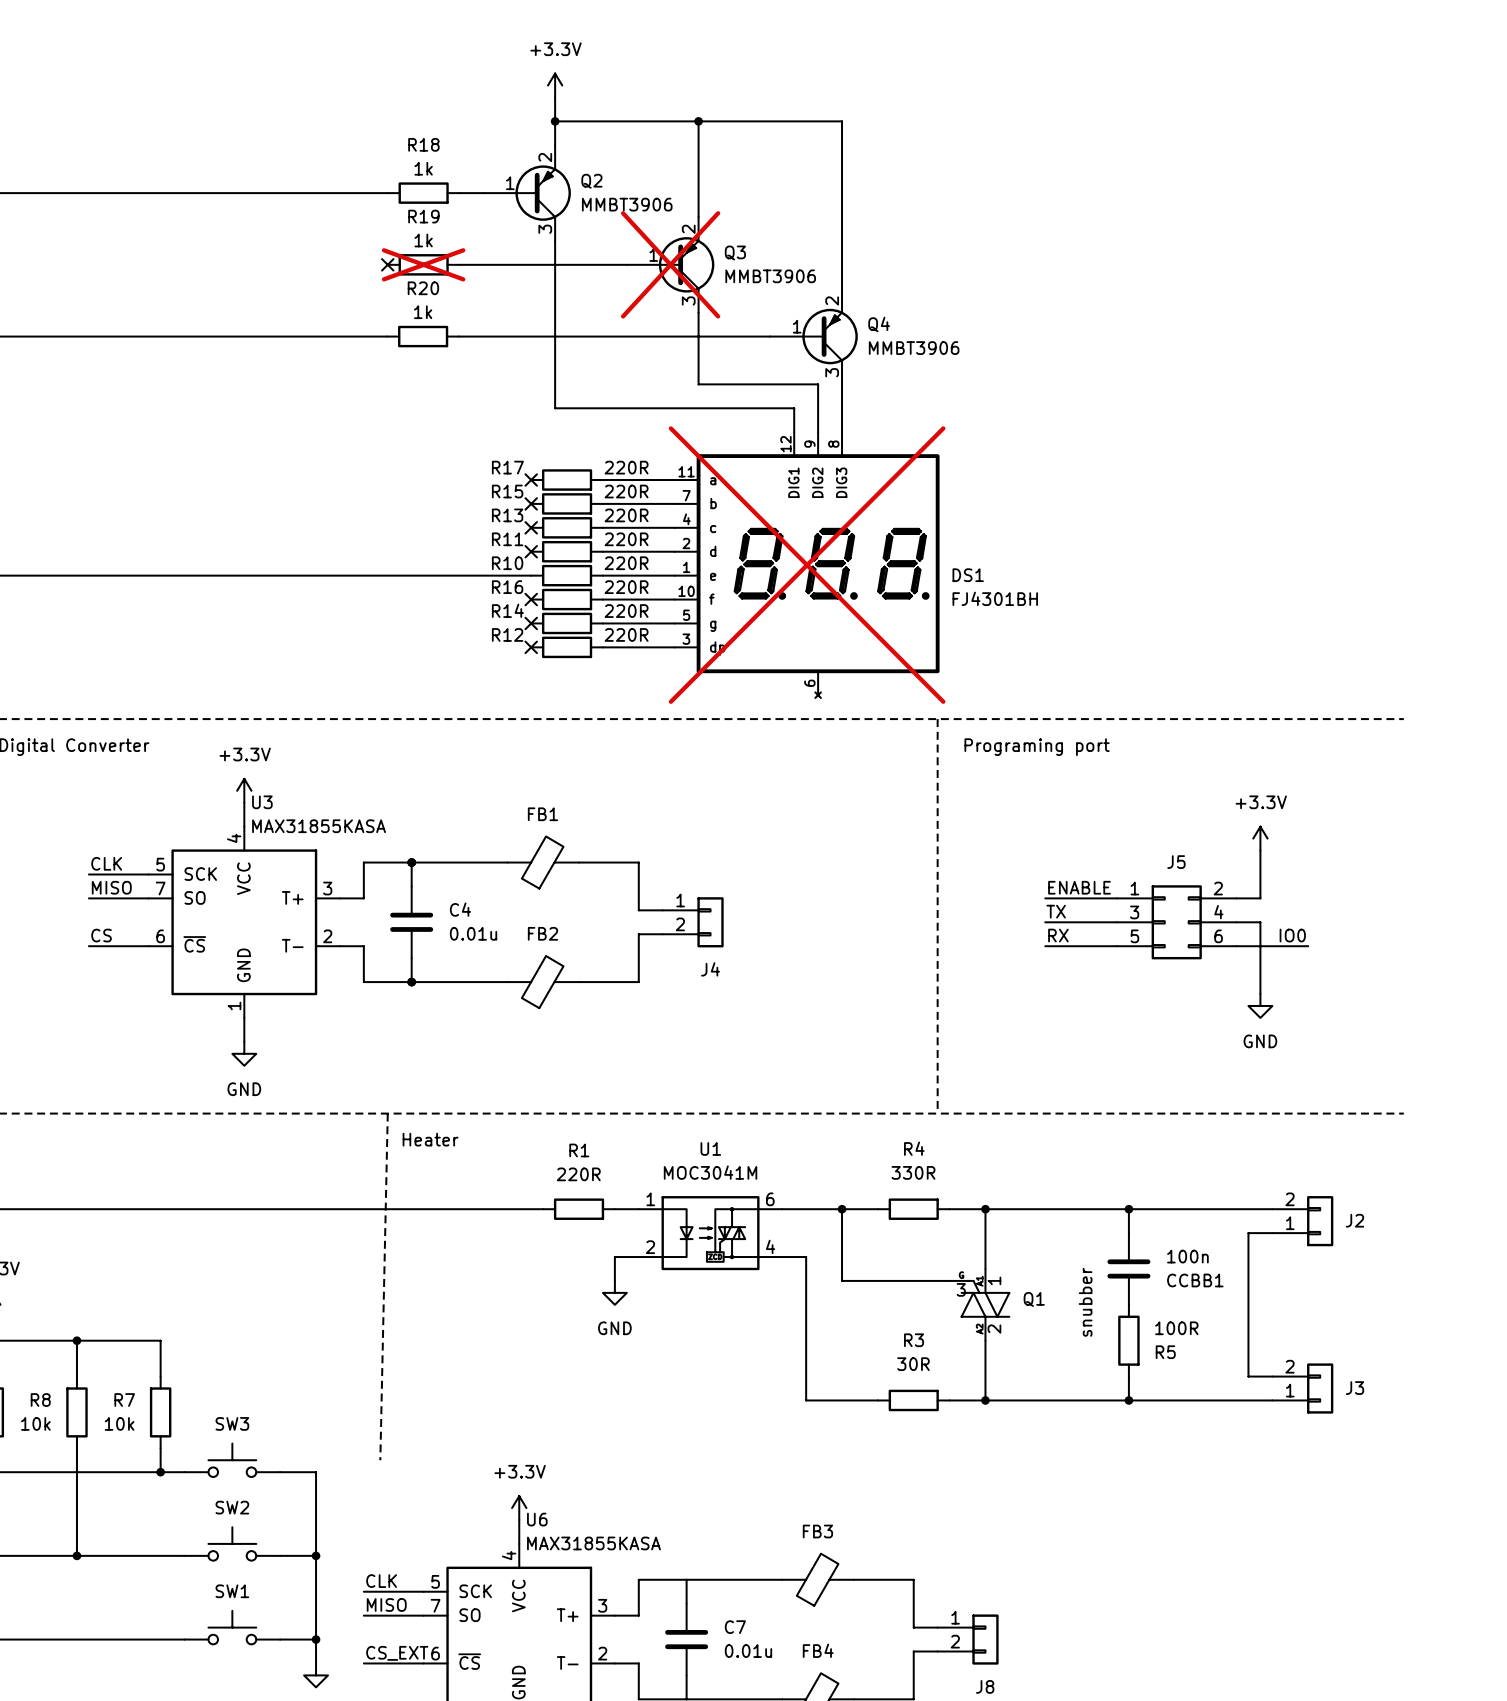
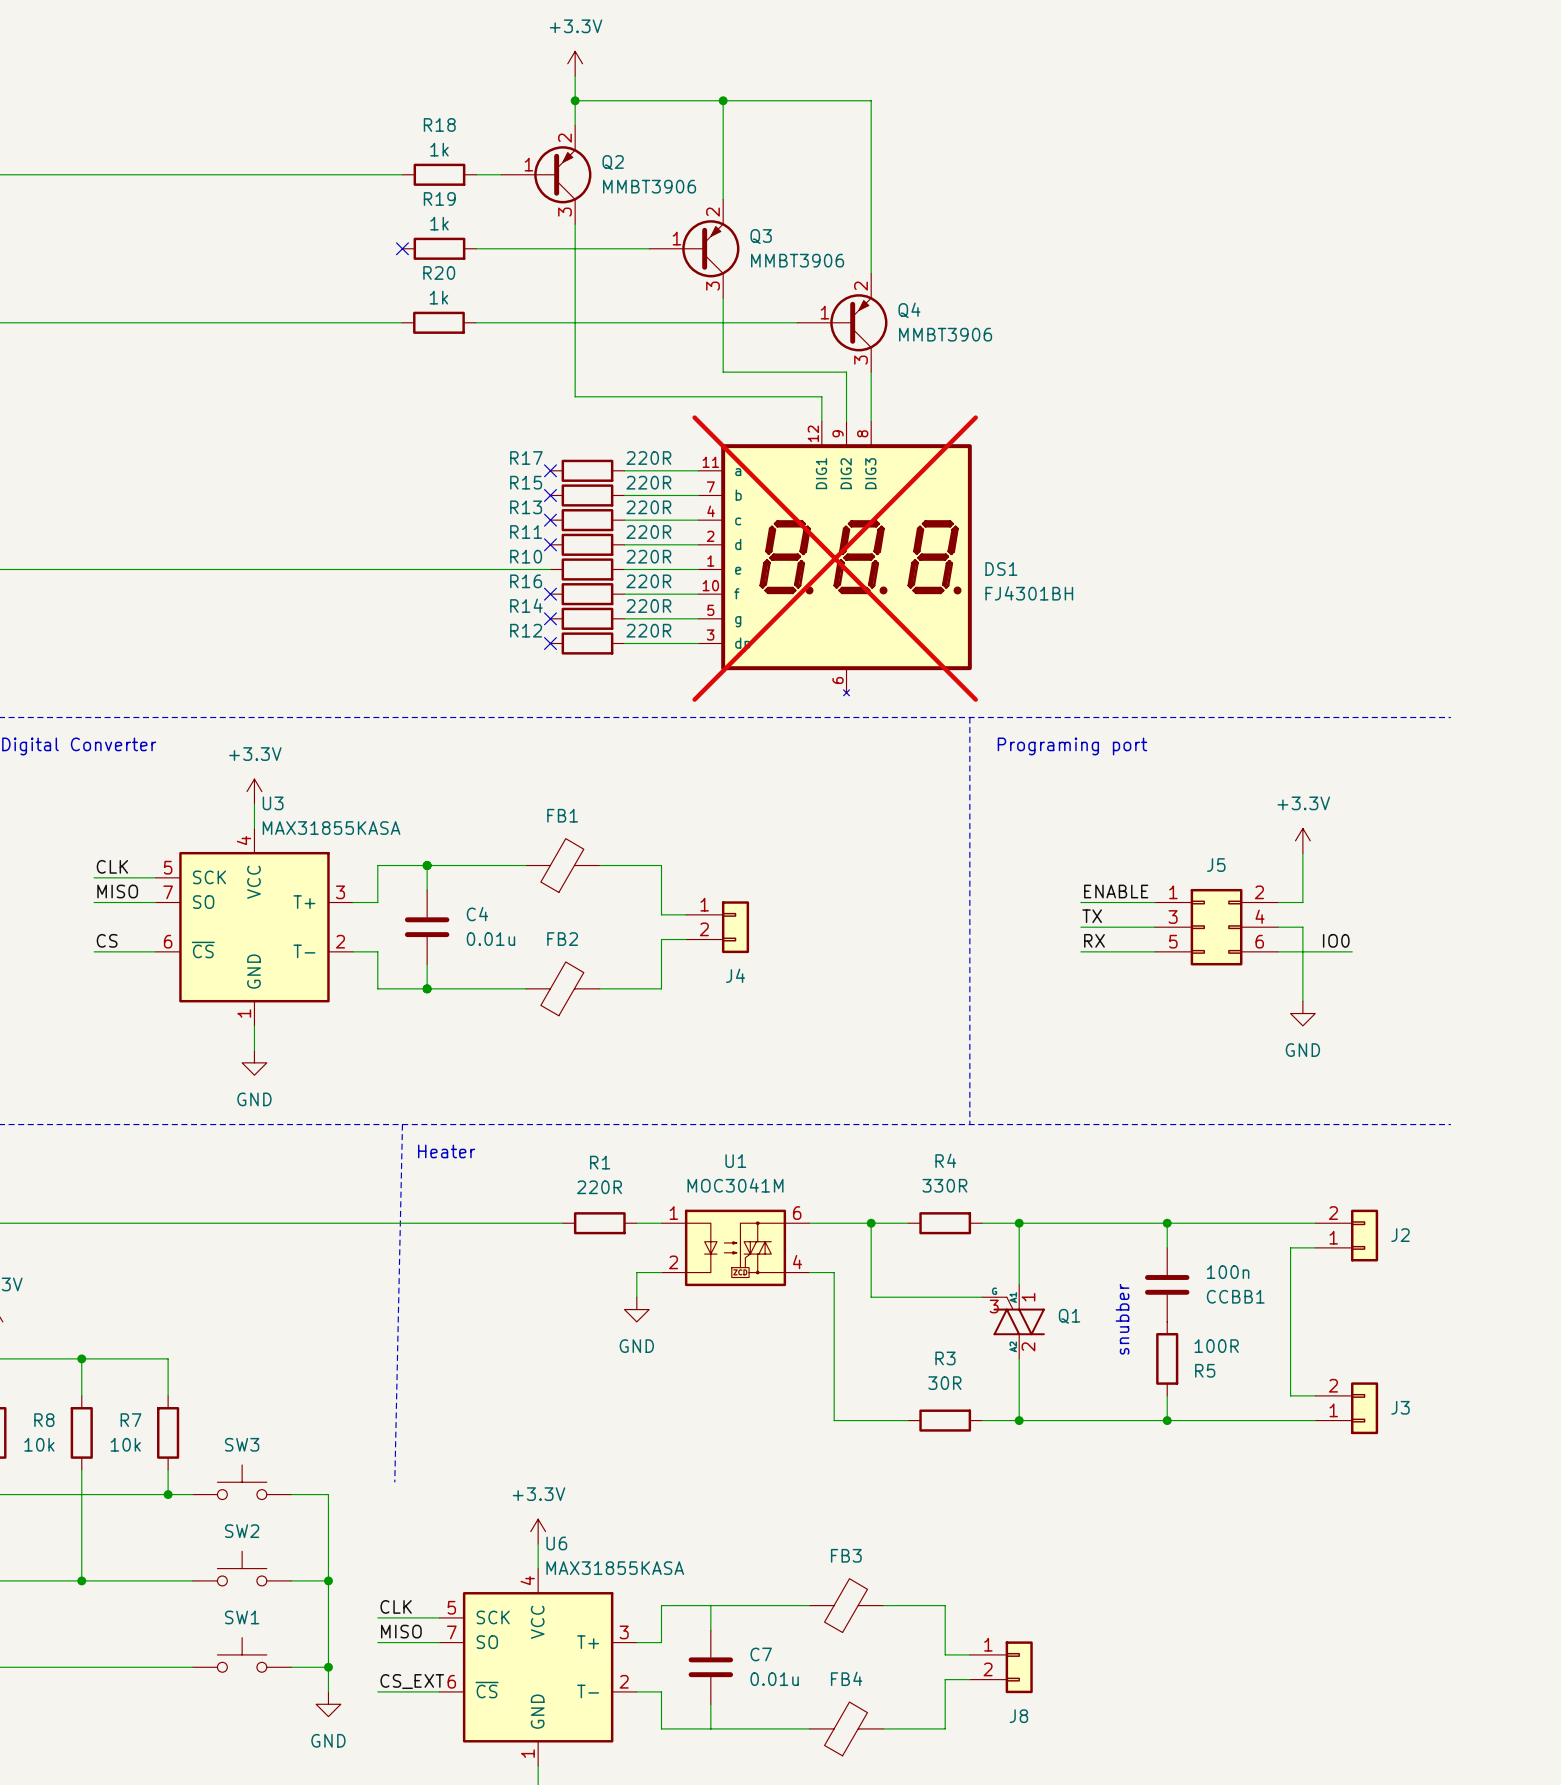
R19 do-not-place cross: (423, 264) -> none
Q3 do-not-place cross: (670, 264) -> none

